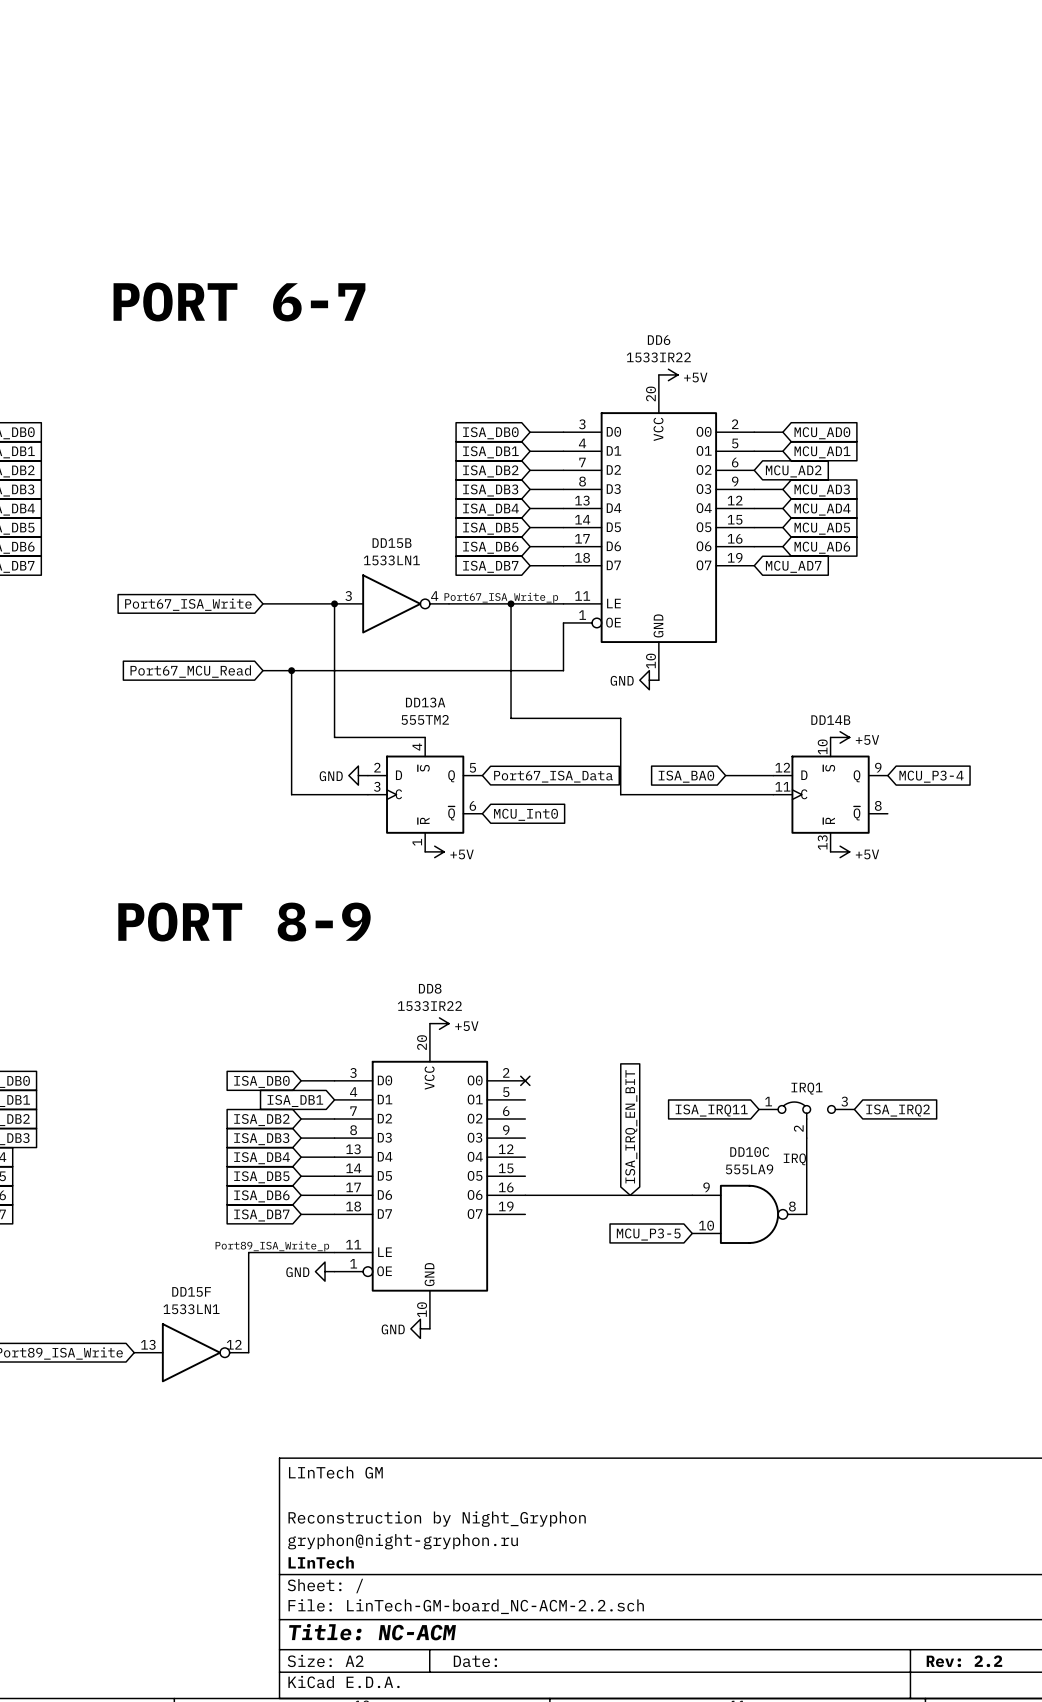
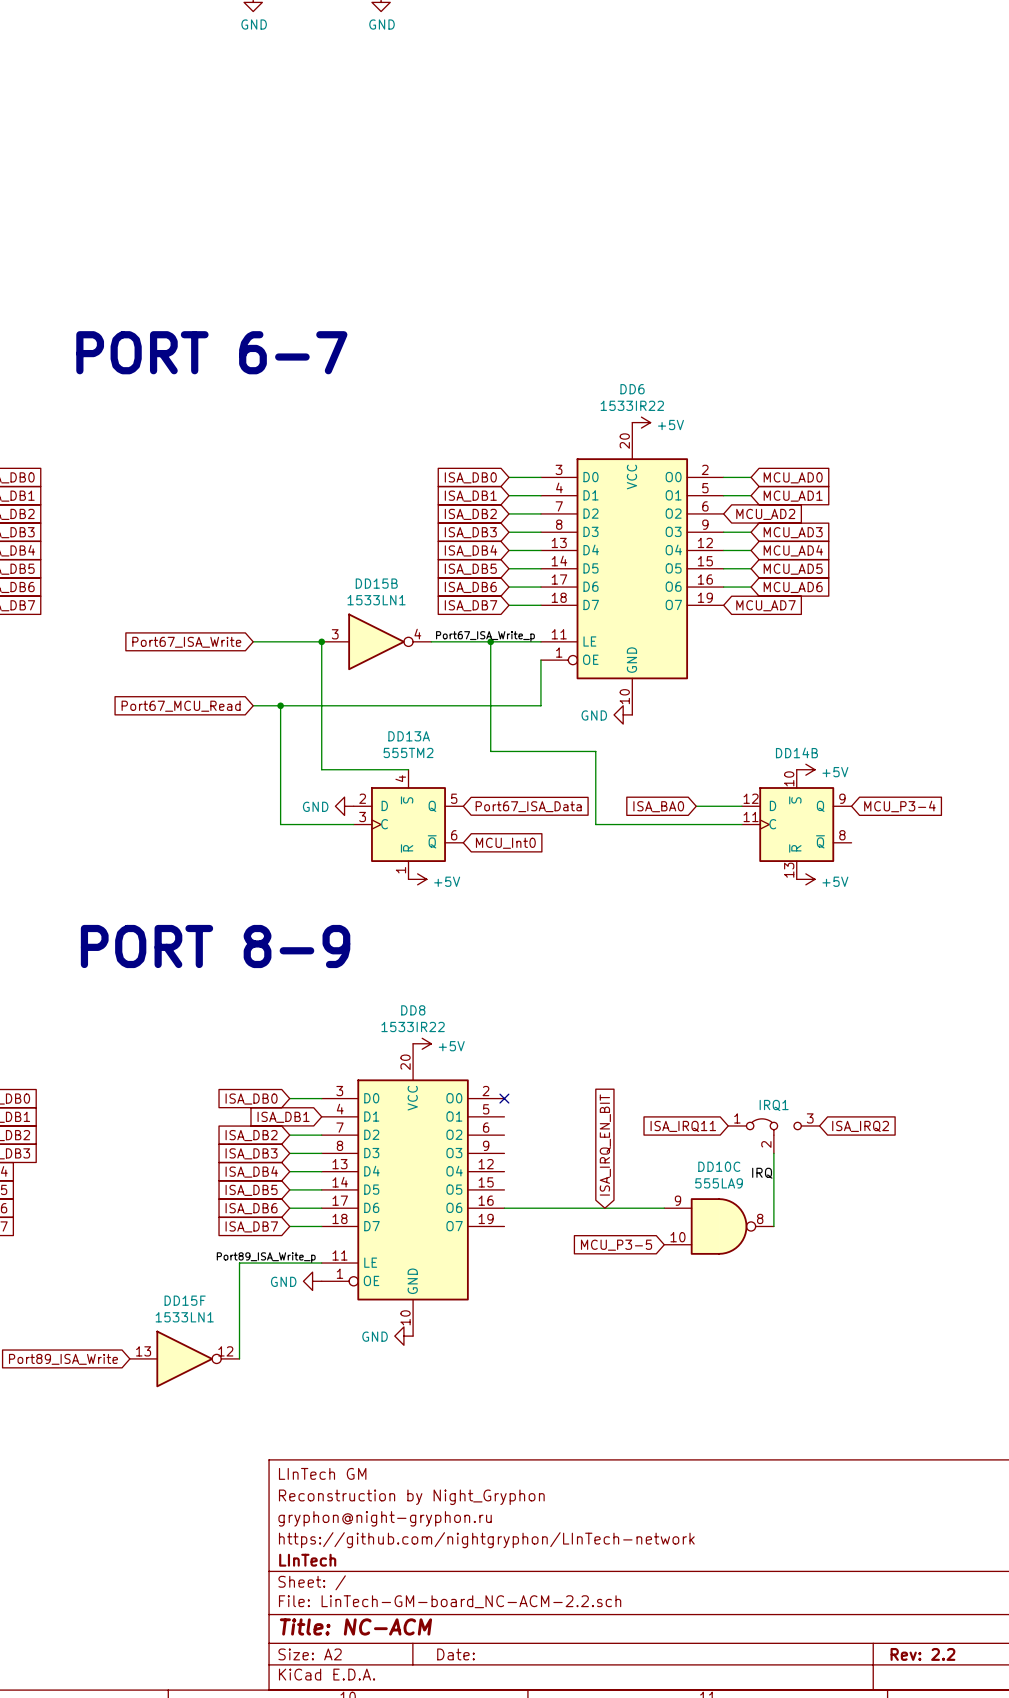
title block: none -> Reconstruction by Night_Gryphon (411, 1497)
title block: Reconstruction by Night_Gryphon (437, 1519) -> gryphon@night-gryphon.ru (385, 1518)
title block: gryphon@night-gryphon.ru (403, 1541) -> https://github.com/nightgryphon/LInTech-network (486, 1540)

